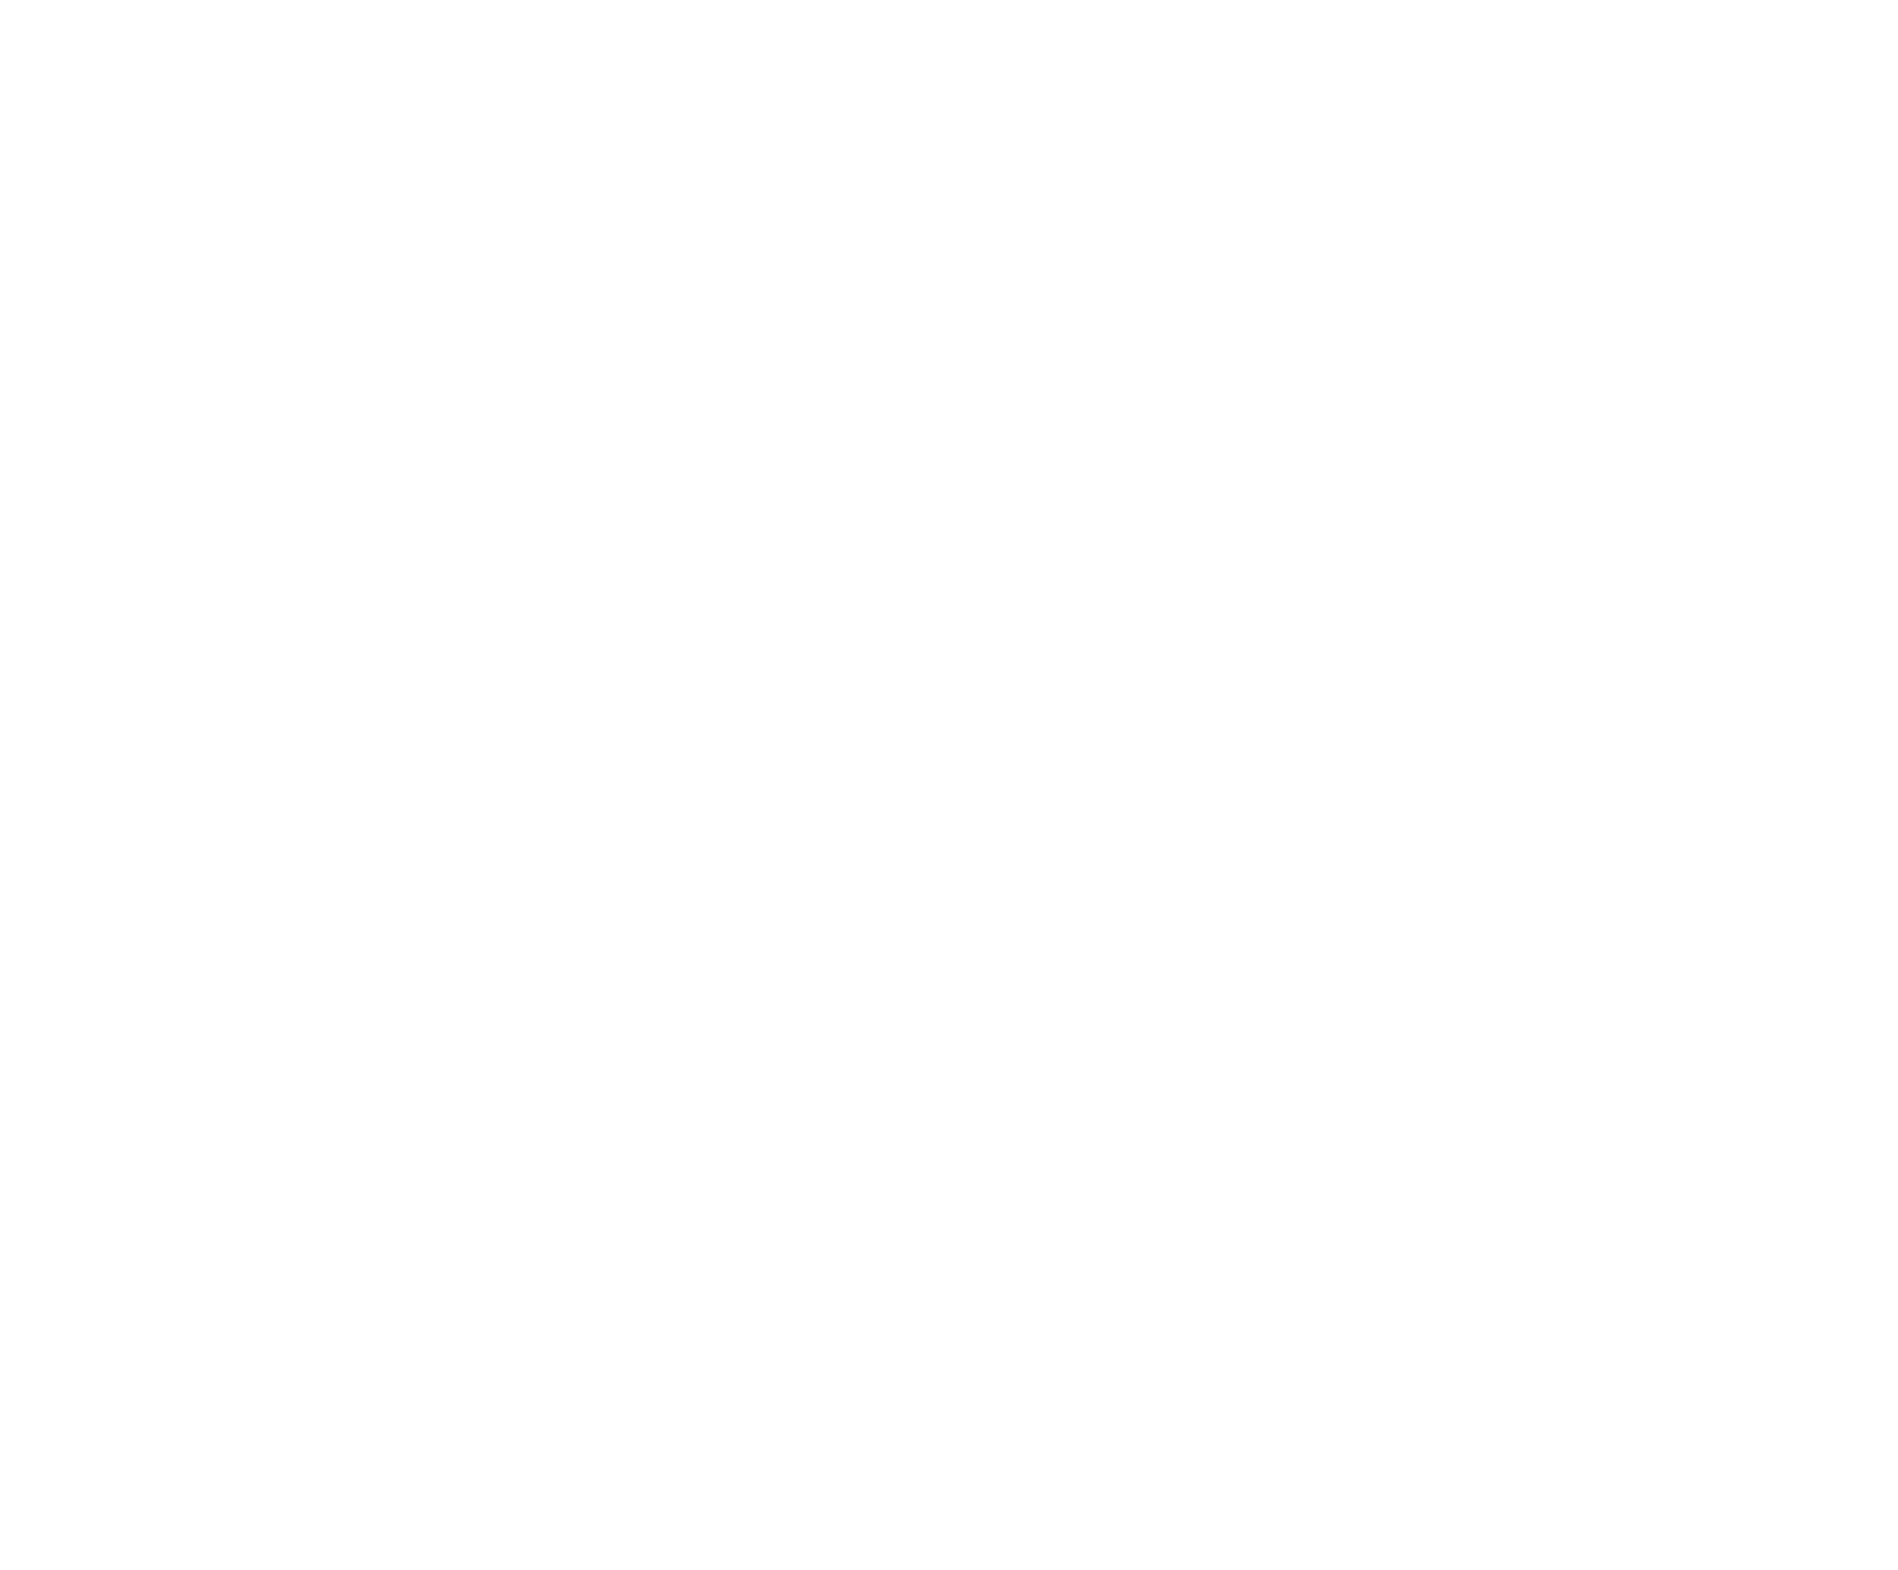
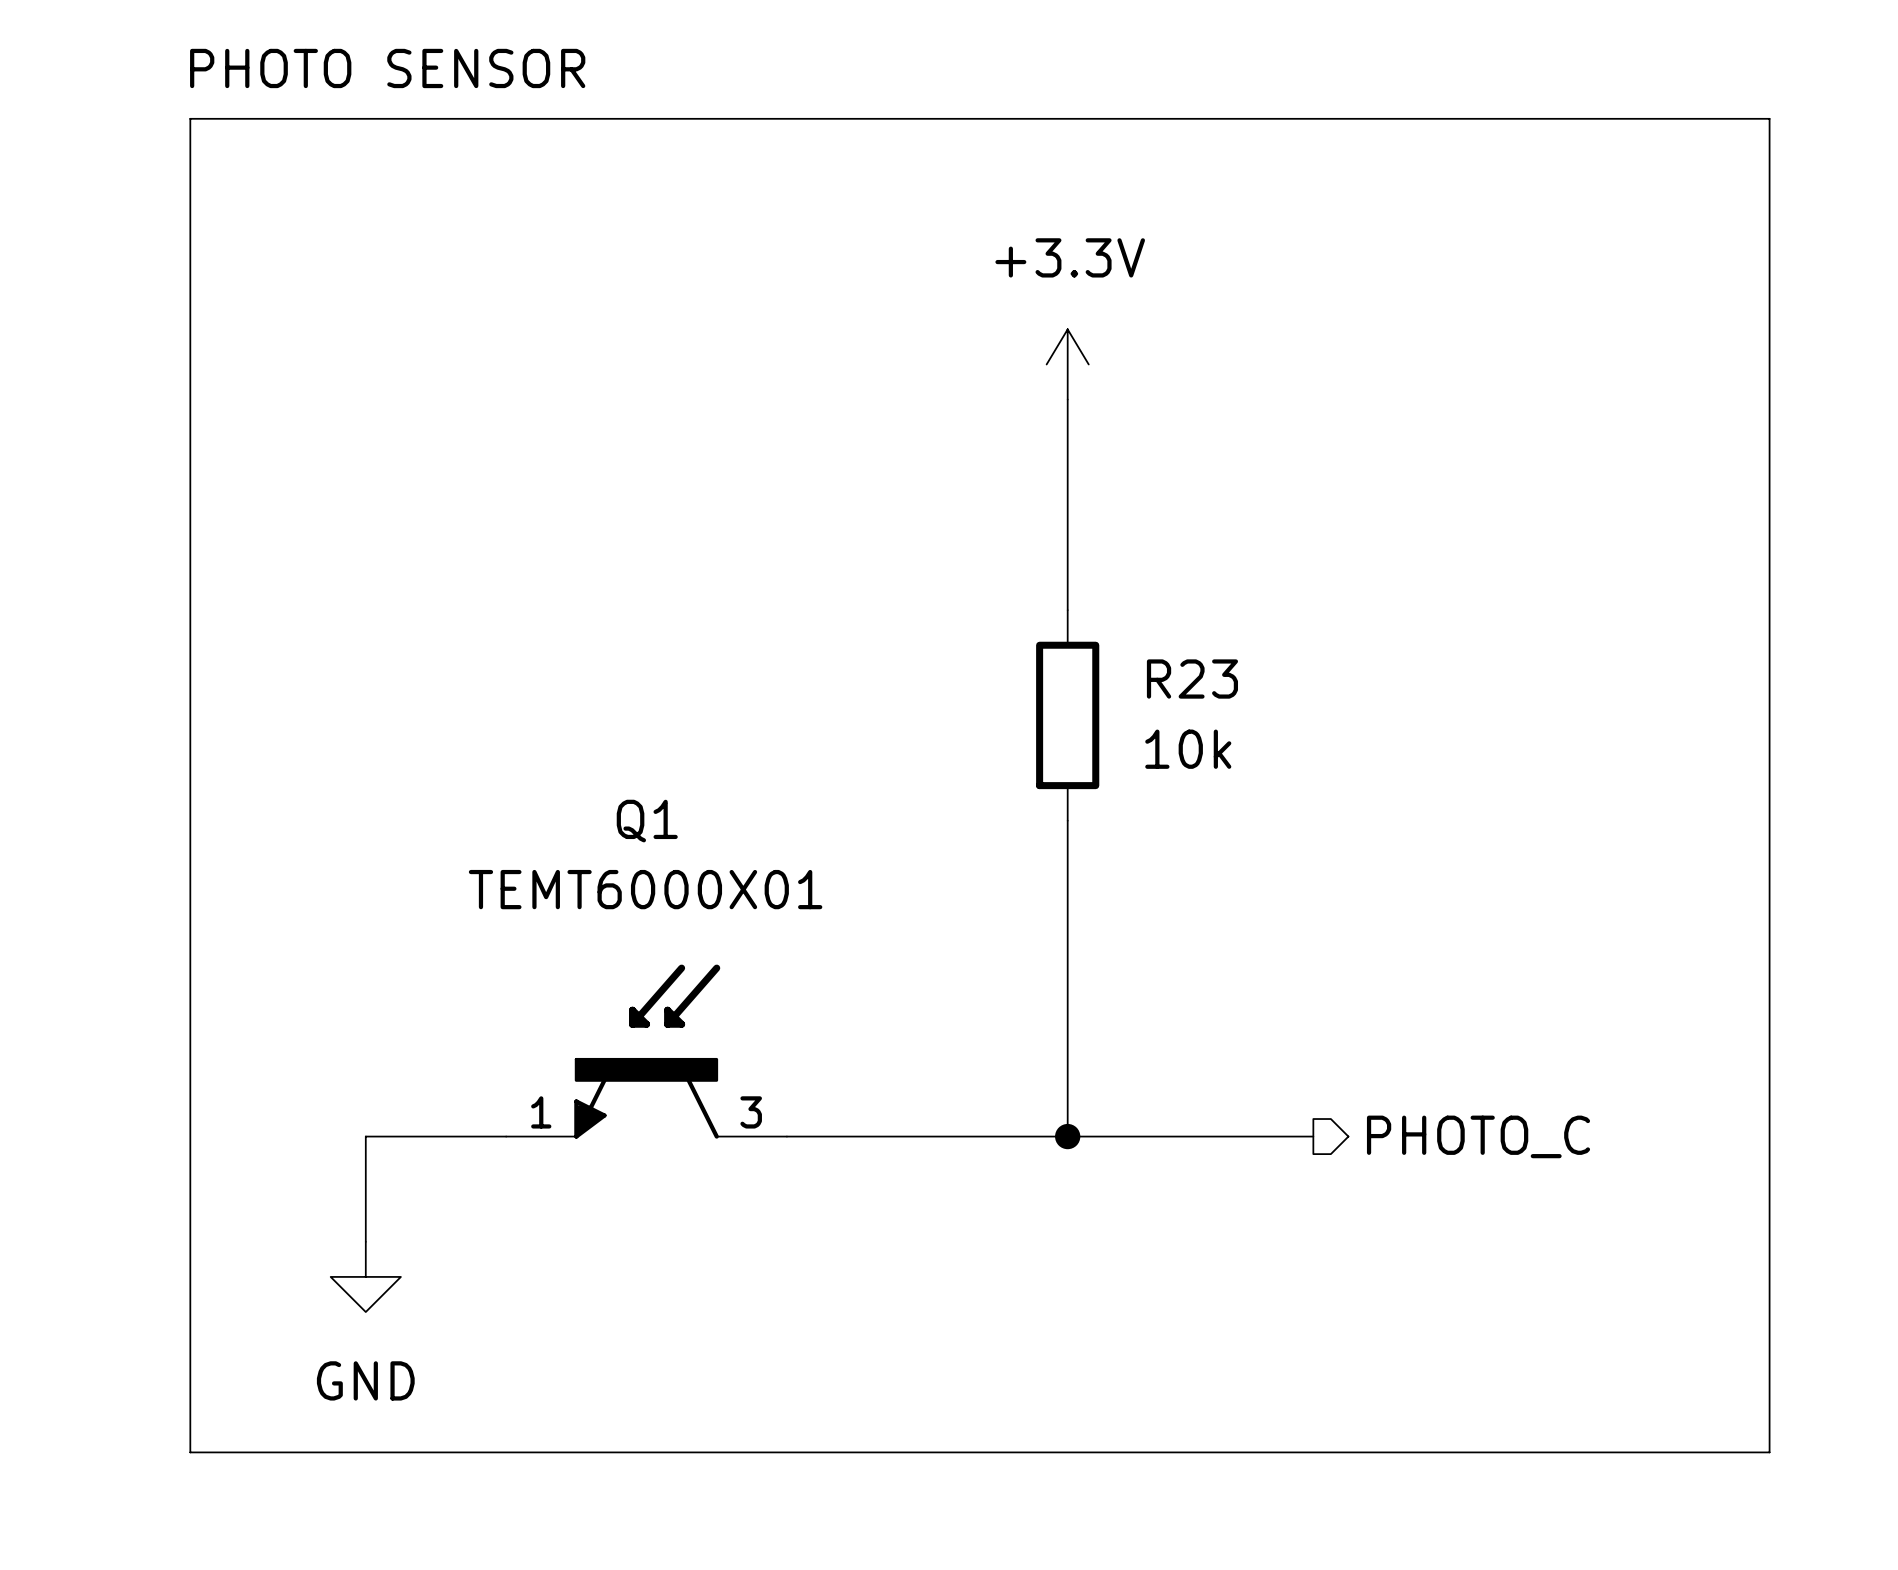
text: none -> PHOTO SENSOR (387, 68)
line: none -> (190, 118) (1769, 118) (1769, 1452) (190, 1452) (190, 118)
power symbol: none -> +3.3V (1067, 364)
wire: none -> (1067, 399) (1067, 610)
R23: none -> 10k (1067, 715)
wire: none -> (1067, 820) (1067, 1136)
Q1: none -> TEMT6000X01 (646, 1051)
wire: none -> (506, 1136) (365, 1136) (365, 1241)
wire: none -> (786, 1136) (1313, 1136)
junction: none -> (1067, 1136)
hierarchical label: none -> PHOTO_C (1478, 1136)
power symbol: none -> GND (365, 1276)

